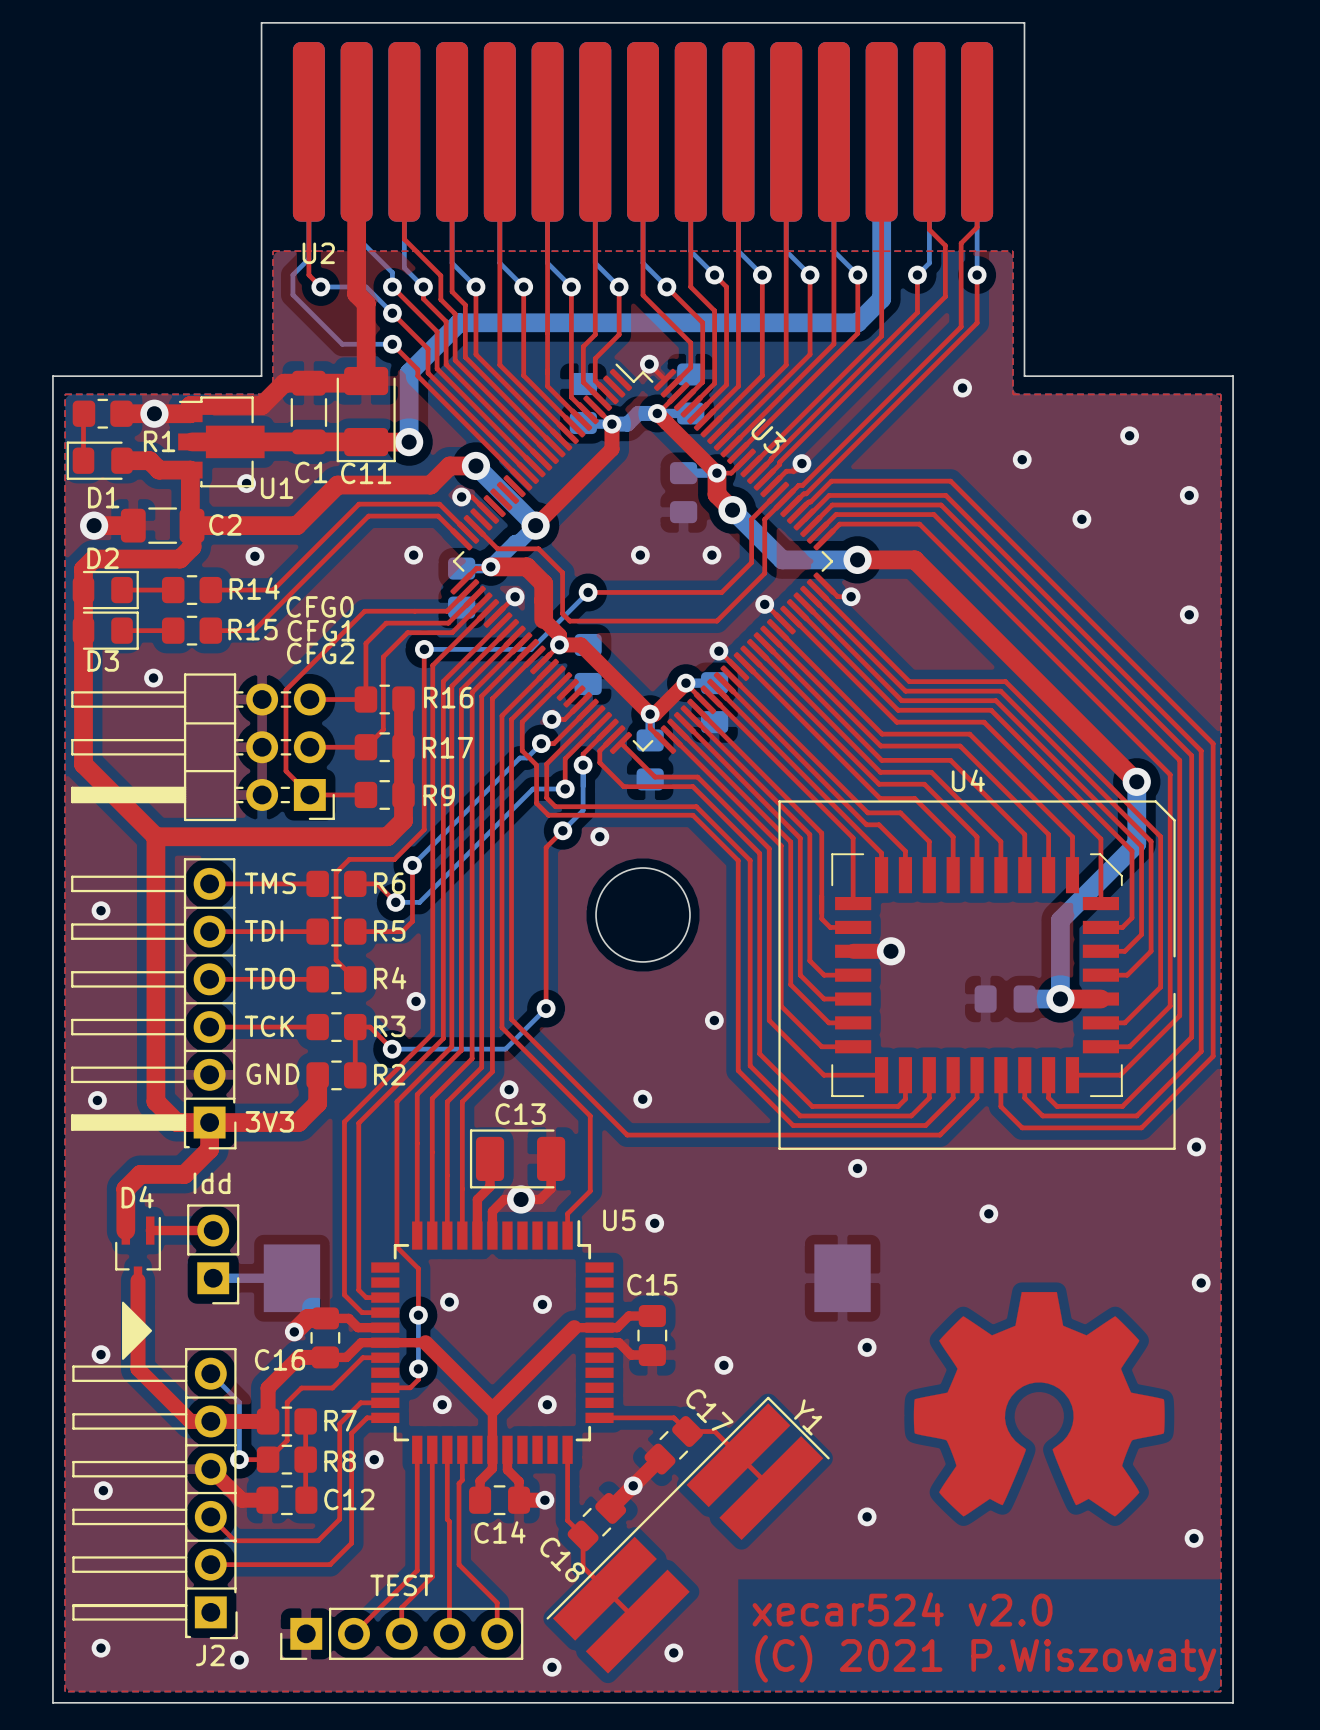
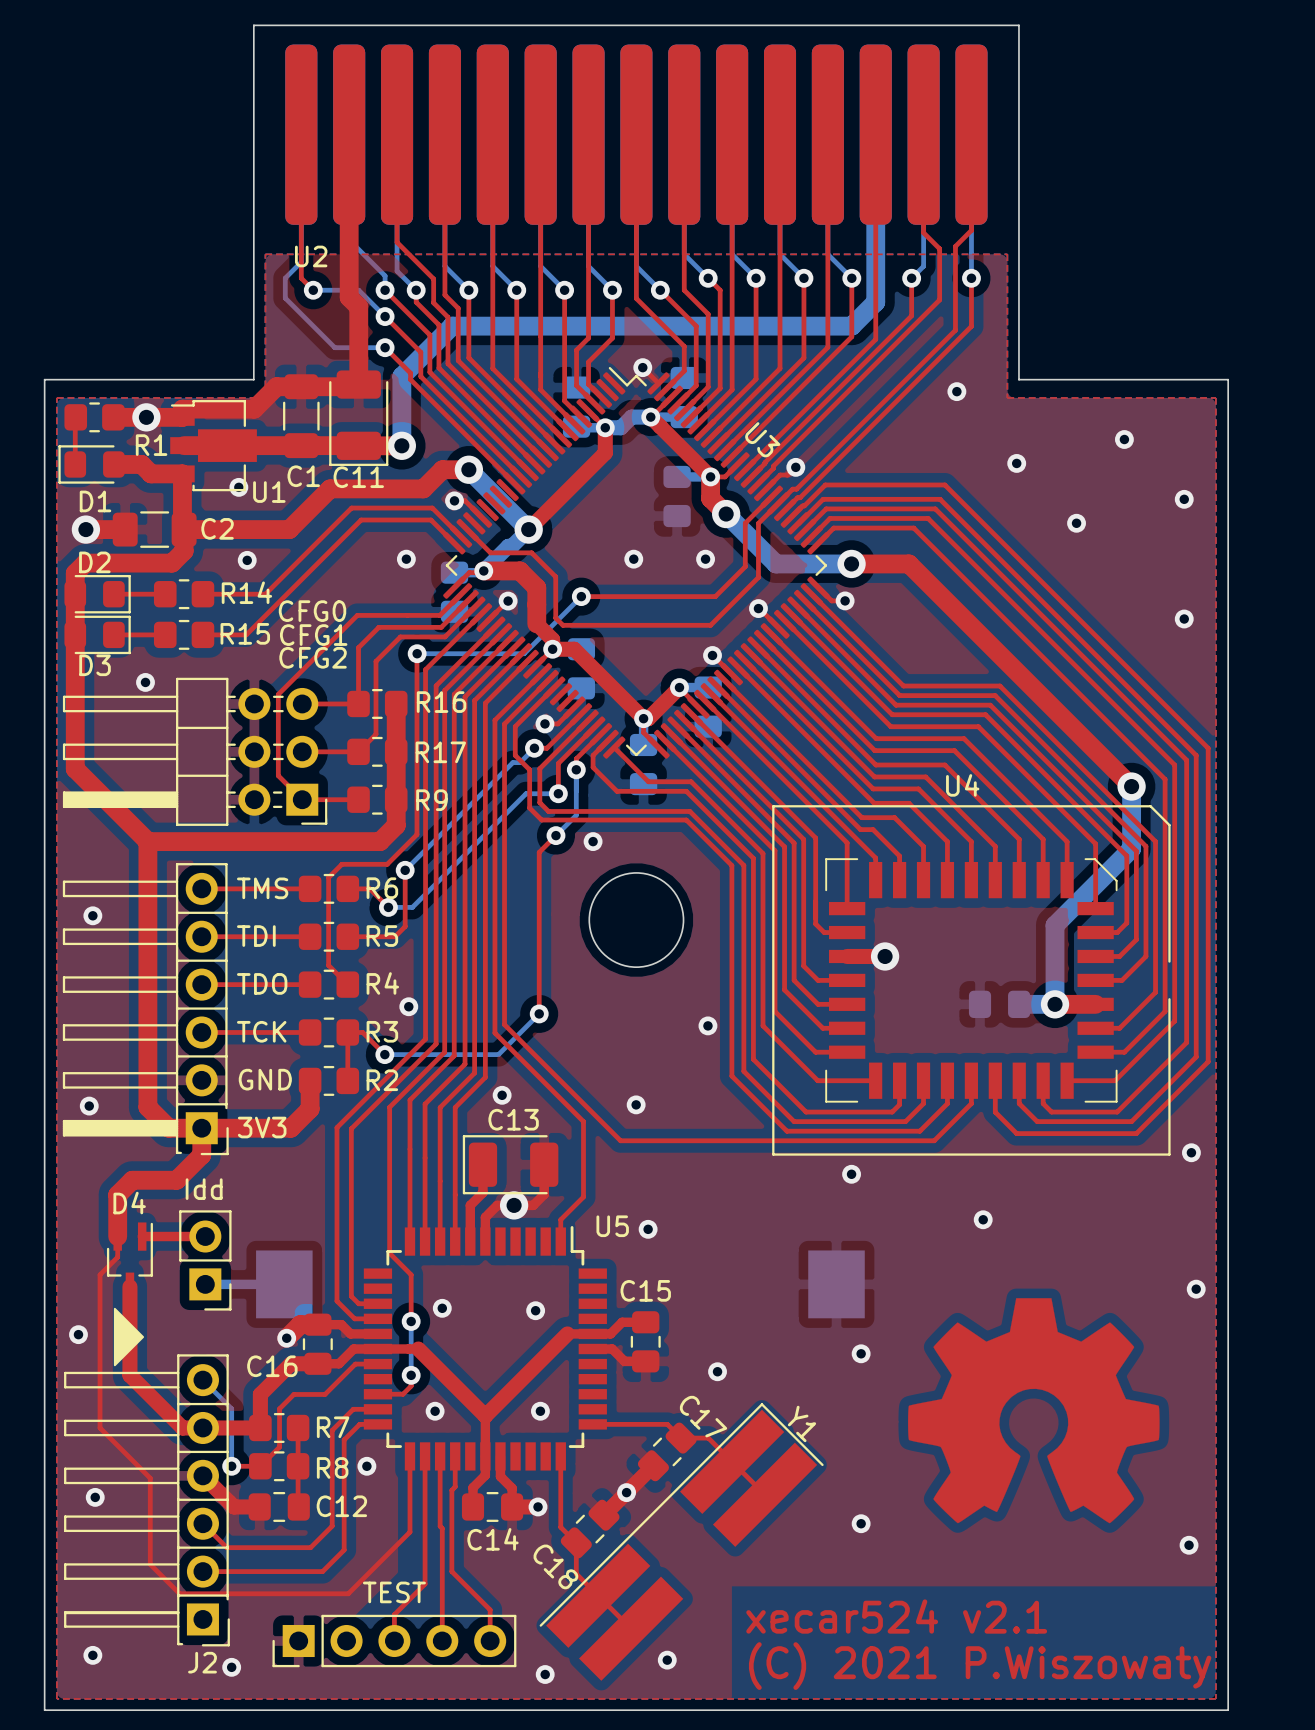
via position: (101, 1354) -> (78, 1334)
top track: (417, 1525) (417, 1570) (354, 1633) -> (409, 1532) (348, 1593) (179, 1593) (150, 1564) (150, 1478) (100, 1427) (100, 1274) (117, 1257) (117, 1236)
text: xecar524 v2.0 (902, 1609) -> xecar524 v2.1 (896, 1616)

